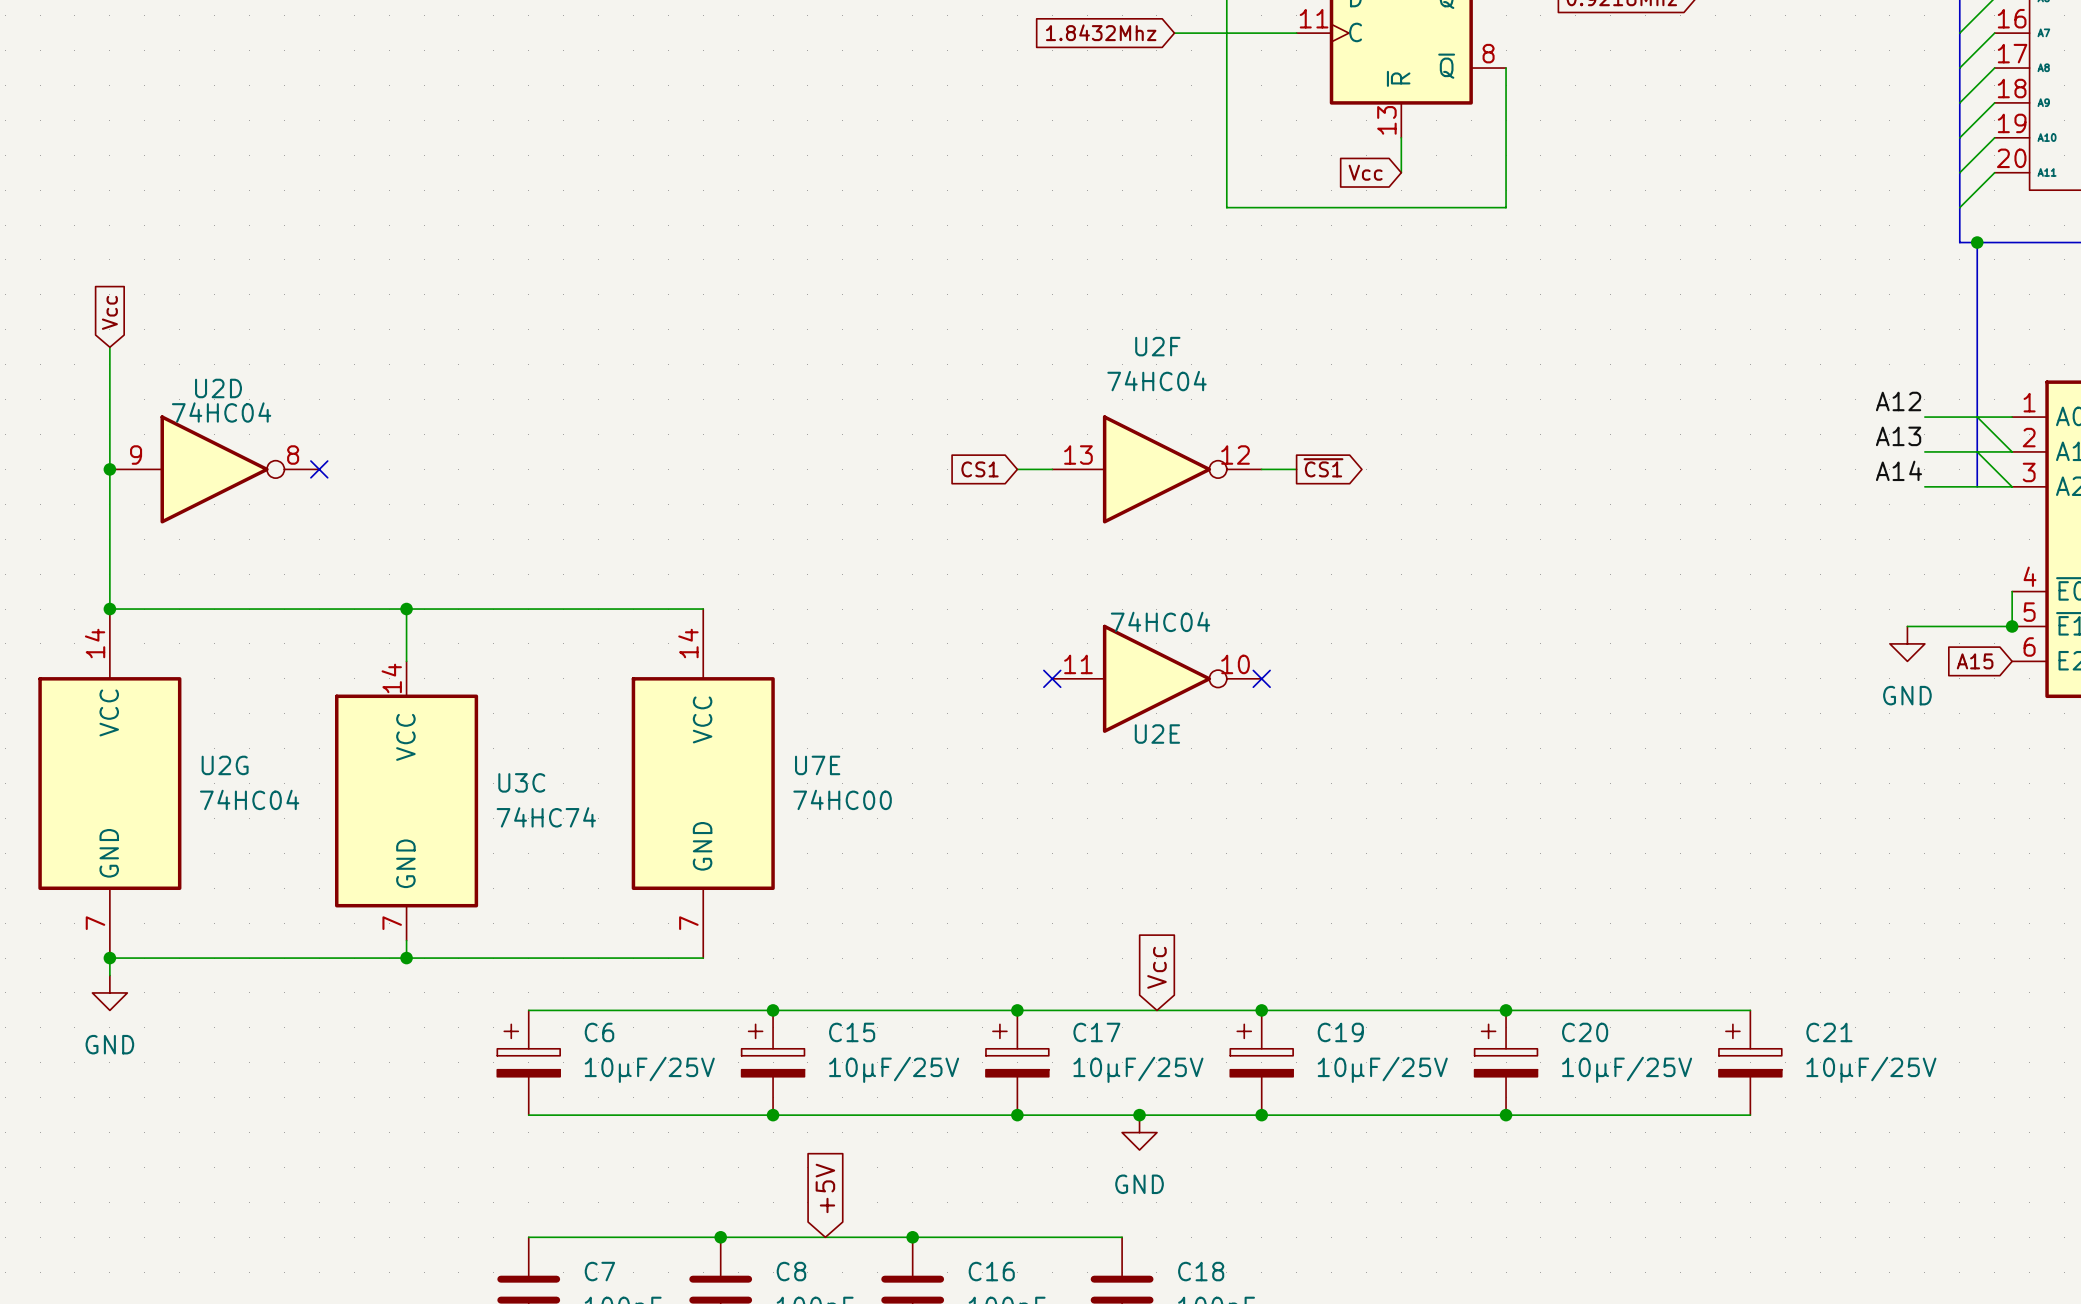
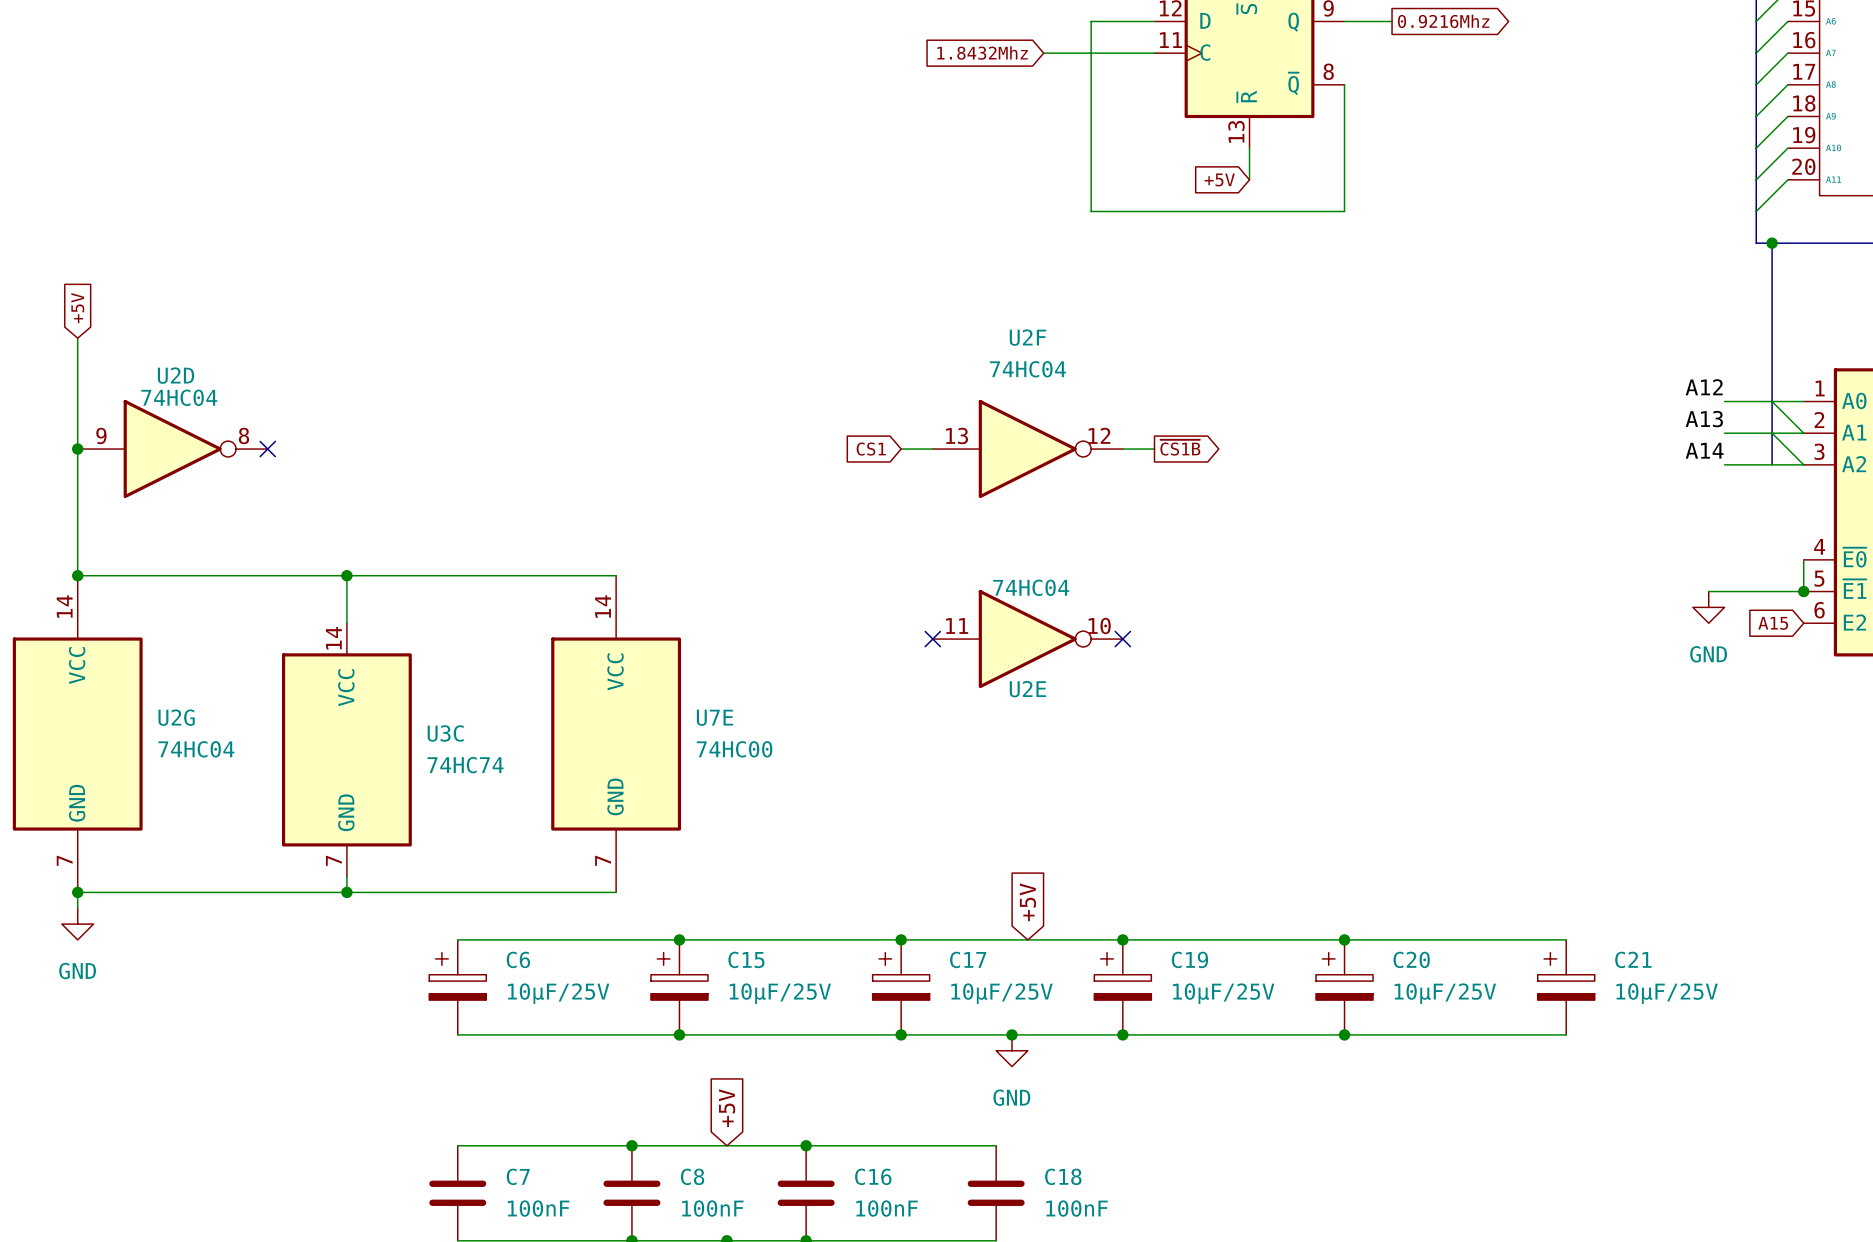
global label: Vcc (1365, 172) -> +5V (1219, 179)
global label: Vcc (109, 312) -> +5V (77, 308)
global label: ~{CS1} (1323, 467) -> ~{CS1B} (1180, 447)
global label: Vcc (1156, 967) -> +5V (1027, 902)

